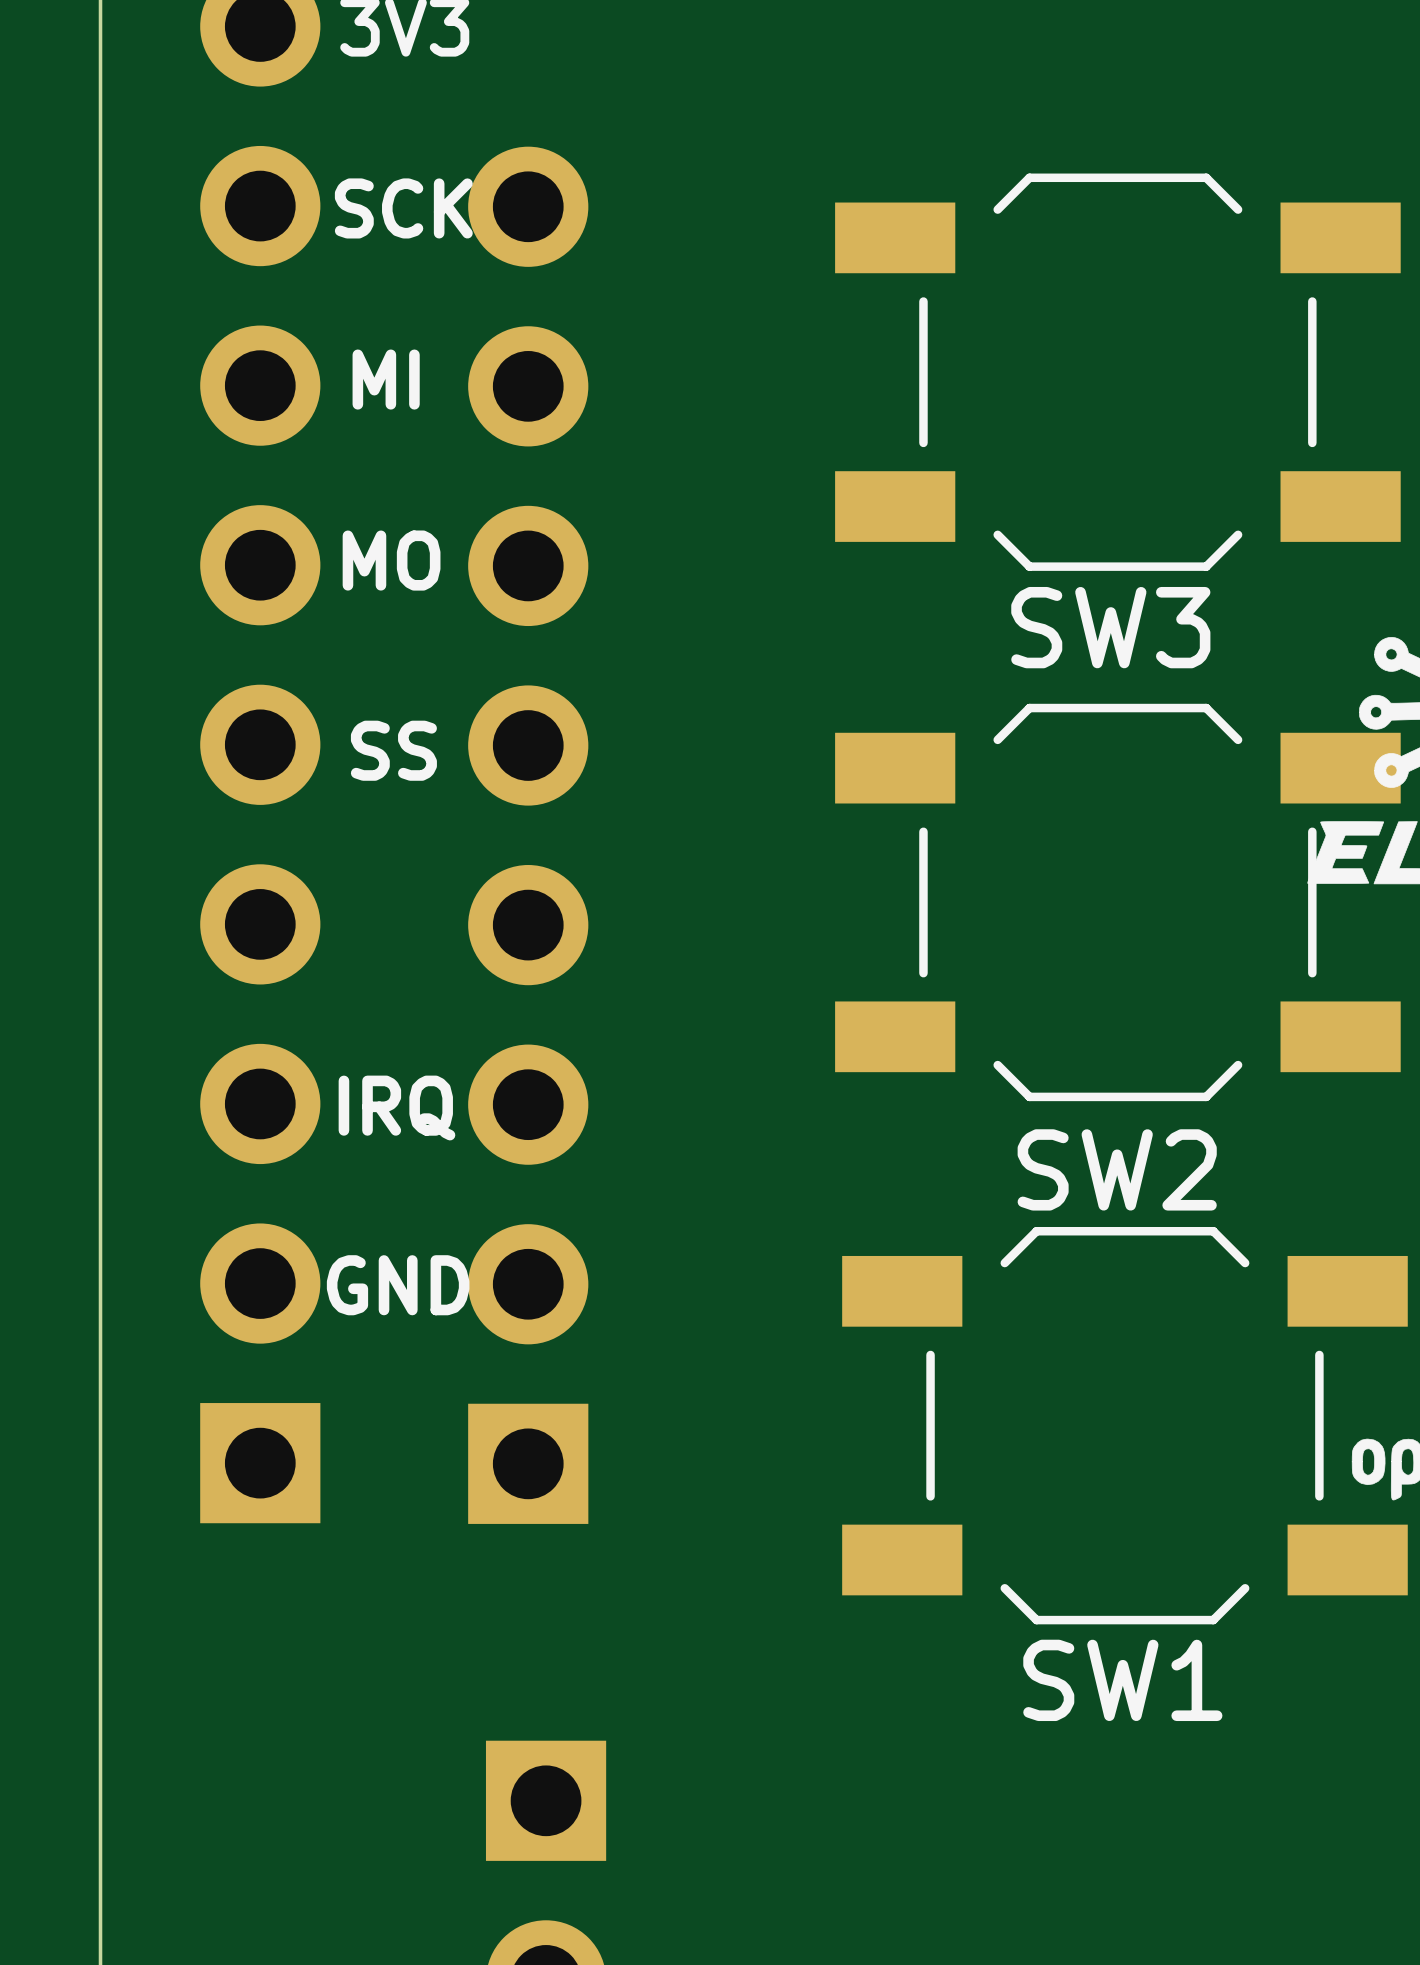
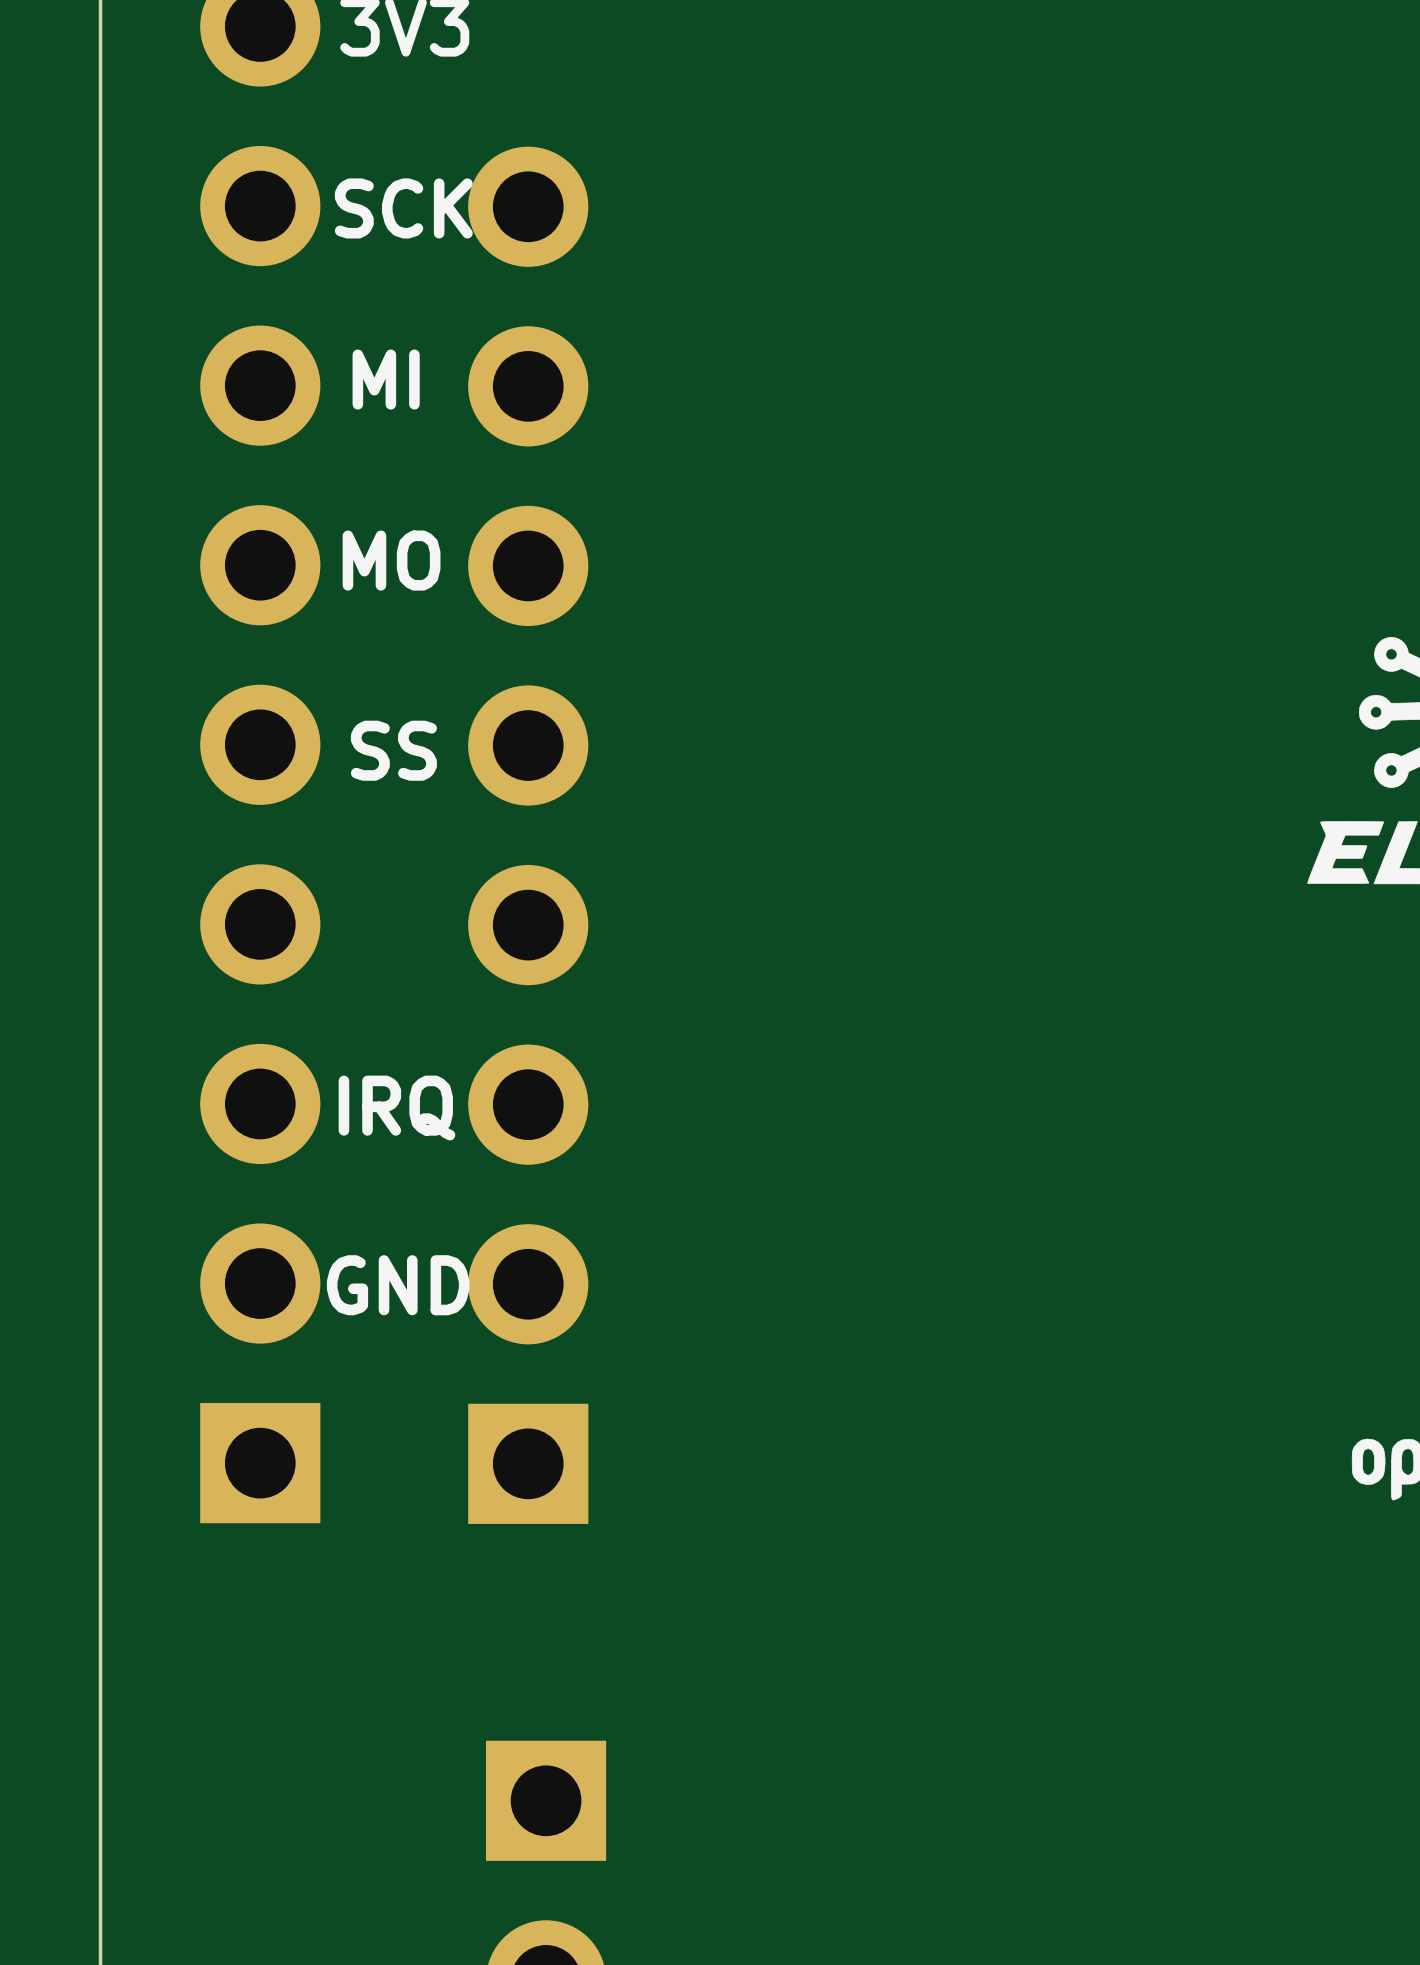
SW3: (1117, 372) -> none
SW2: (1117, 902) -> none
SW1: (1124, 1425) -> none

